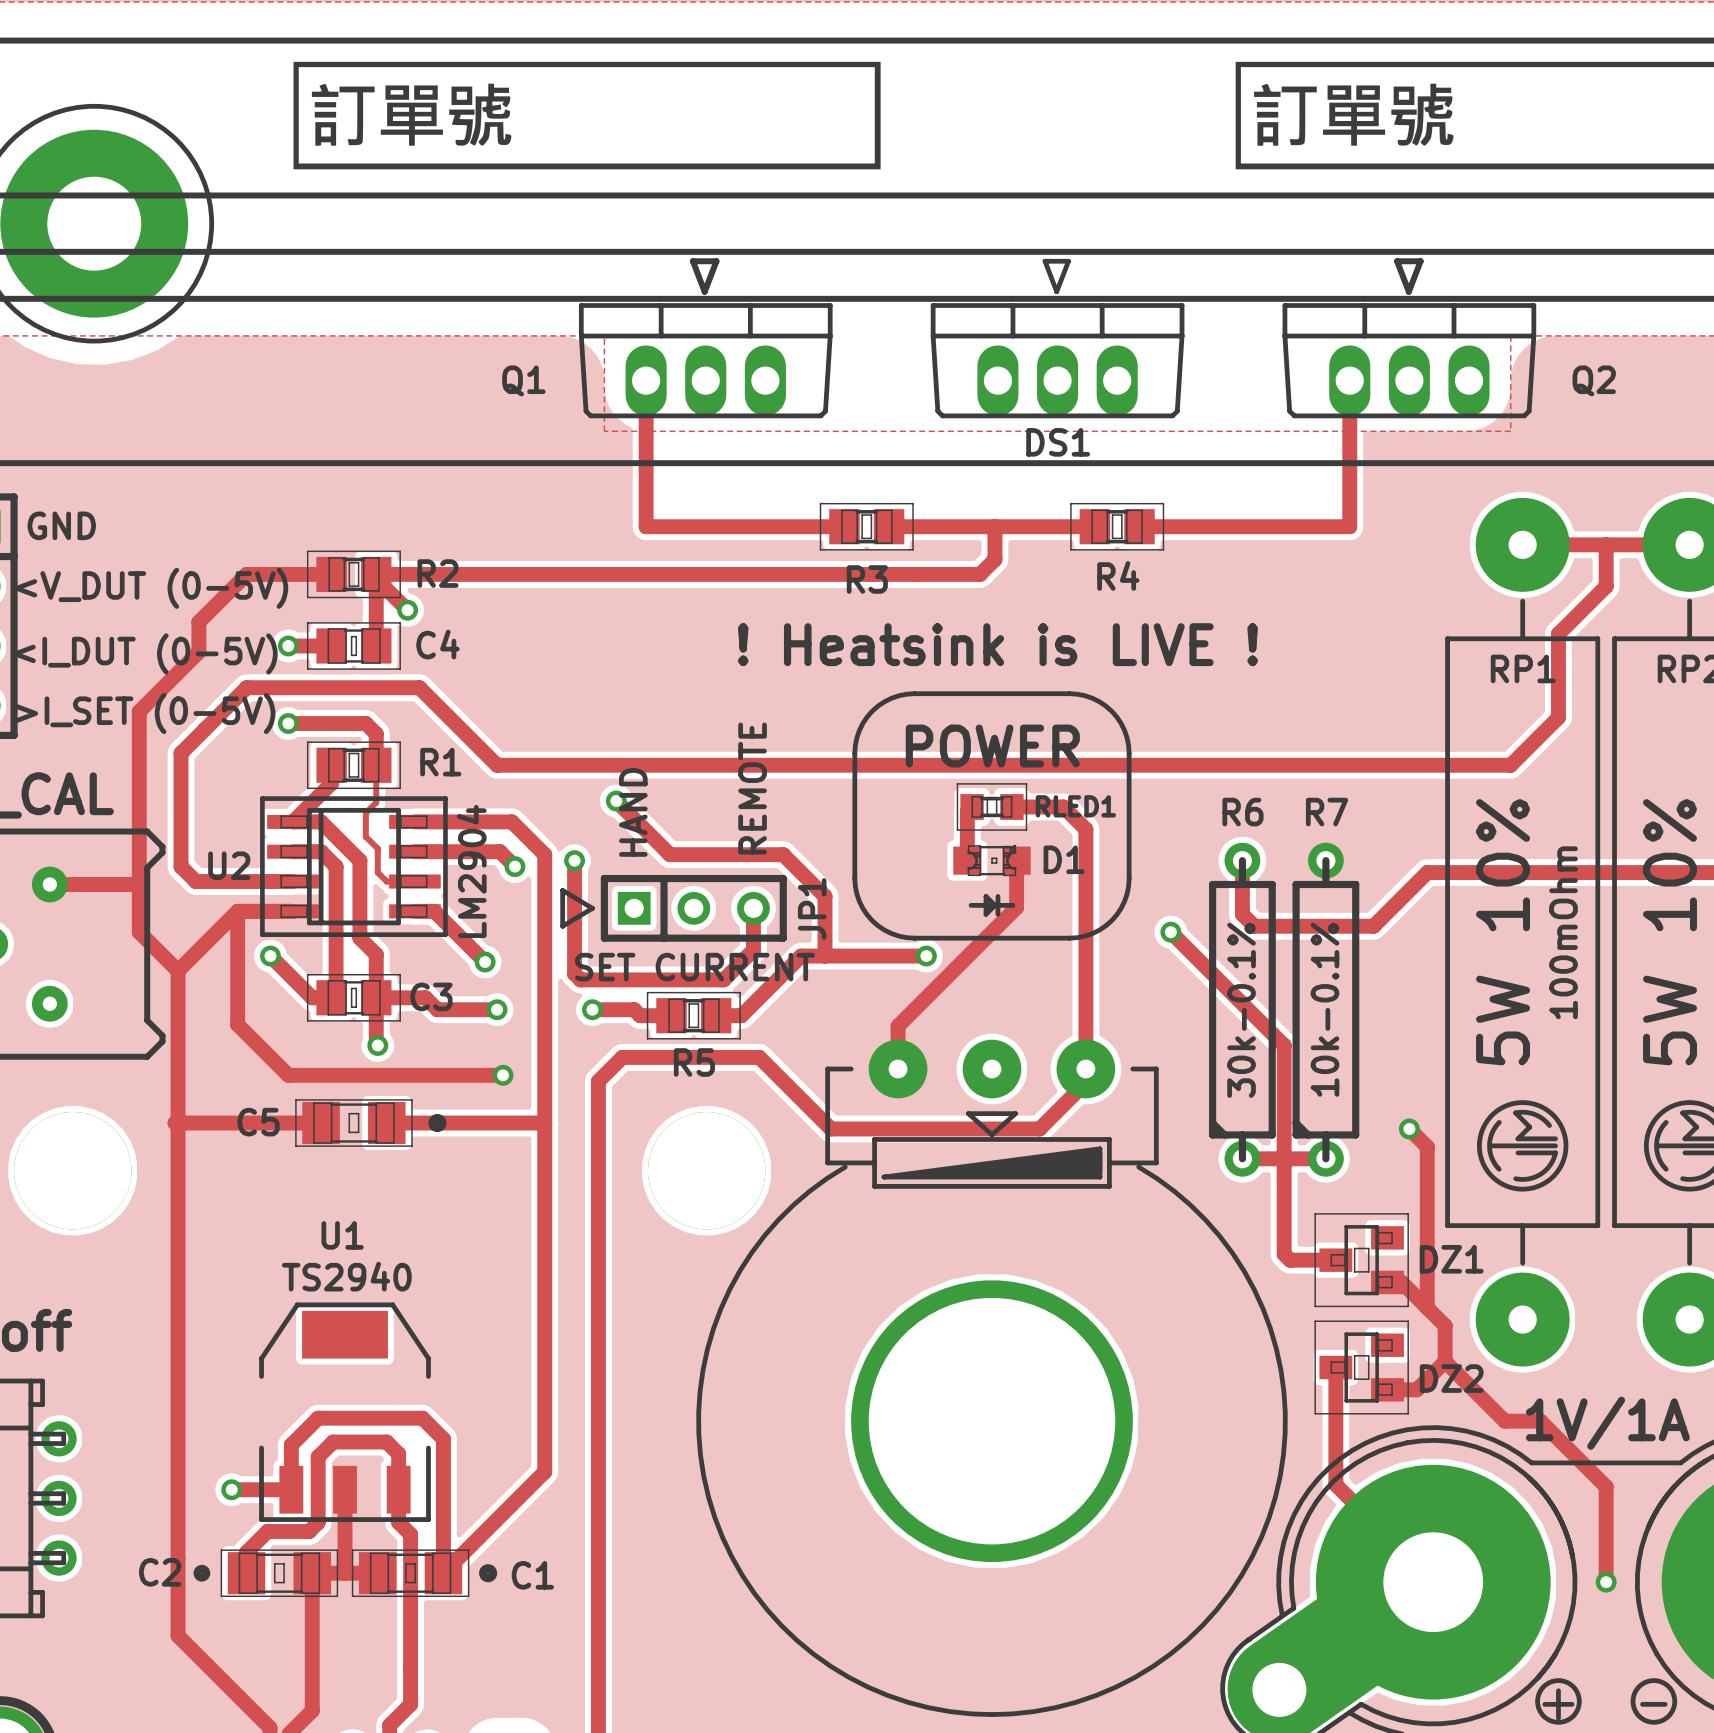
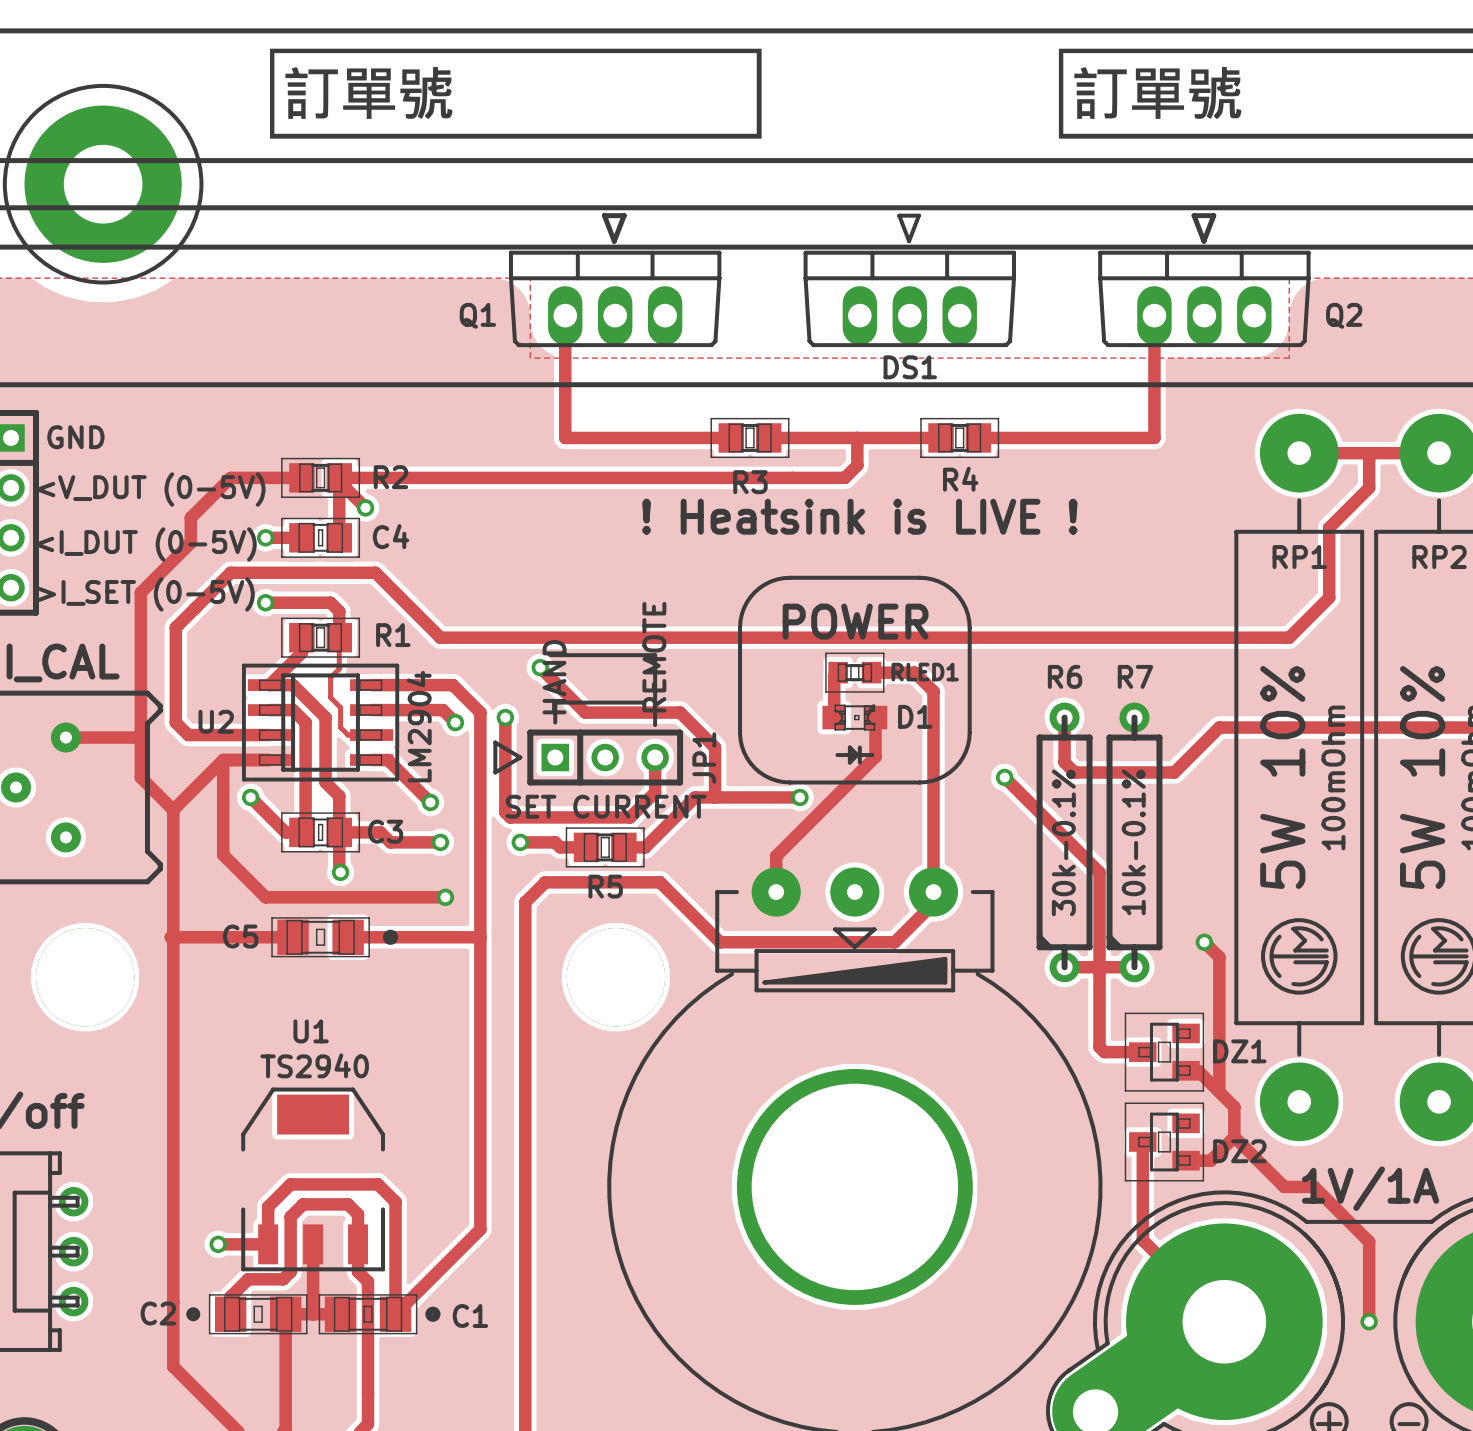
Q1 name position: Q1 (523, 380) -> Q1 (477, 315)
Q2 name position: Q2 (1594, 380) -> Q2 (1344, 315)
text position: ! Heatsink is LIVE ! (997, 644) -> ! Heatsink is LIVE ! (859, 516)
line: none -> (550, 655) (655, 655) (655, 725)
line: none -> (642, 702) (555, 702) (555, 722)

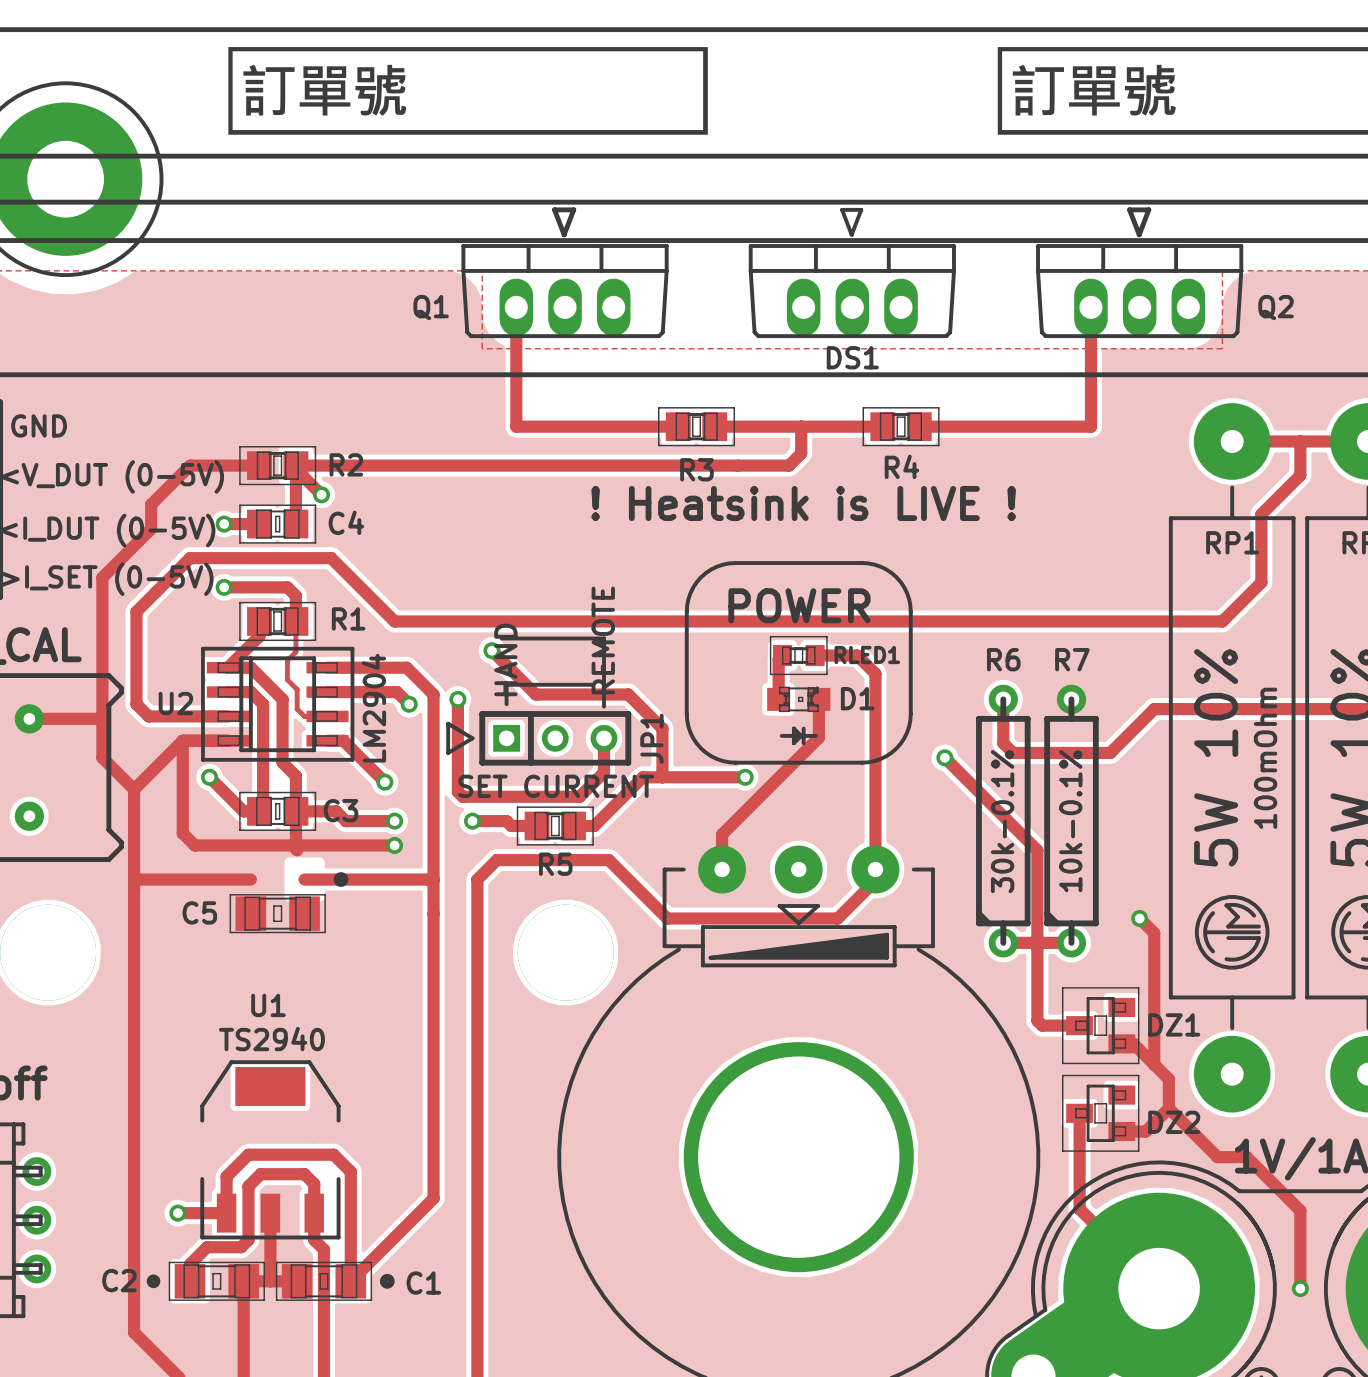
track: (235, 867) (265, 897) (445, 897) -> (194, 845) (394, 845)
via: (340, 872) -> none
via position: (445, 897) -> (394, 845)
track: none -> (134, 879) (250, 879)
track: (170, 937) (293, 937) -> none
track: (348, 937) (480, 937) -> (304, 879) (433, 879)
drawing position: (390, 937) -> (341, 879)
drawing position: (390, 937) -> (341, 879)

